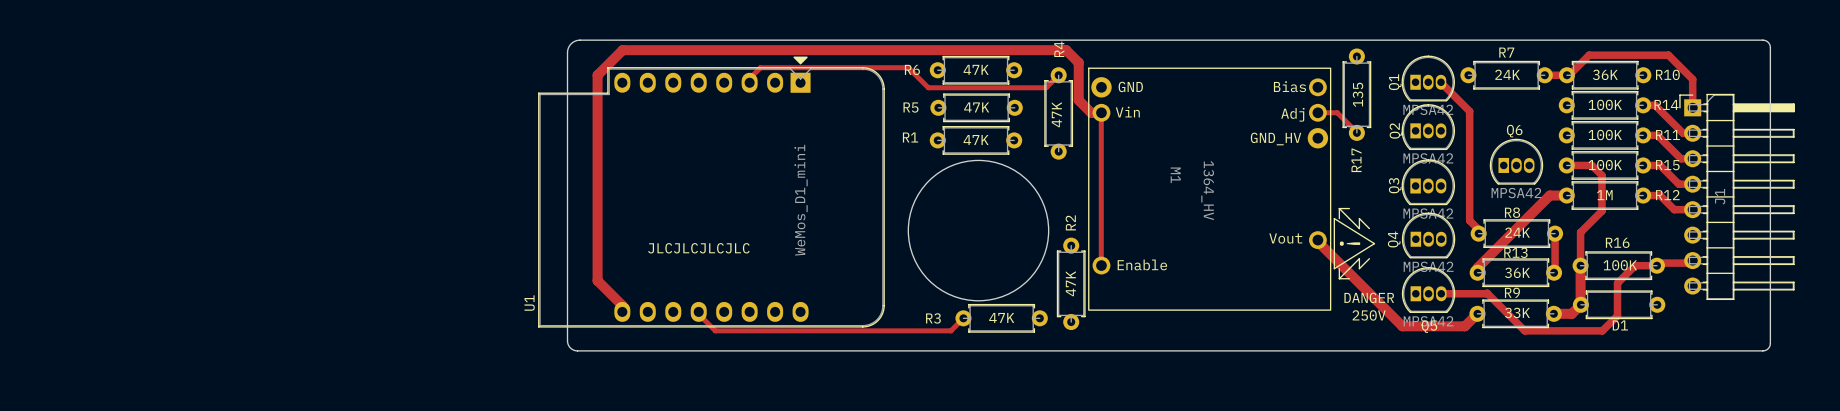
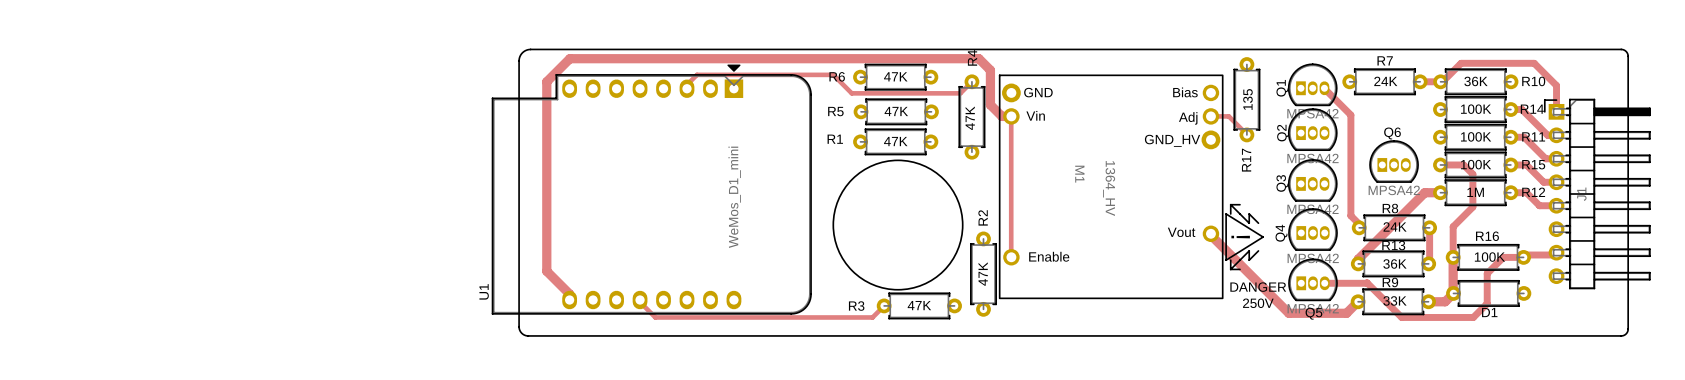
text: JLCJLCJLCJLC (698, 248) -> none

